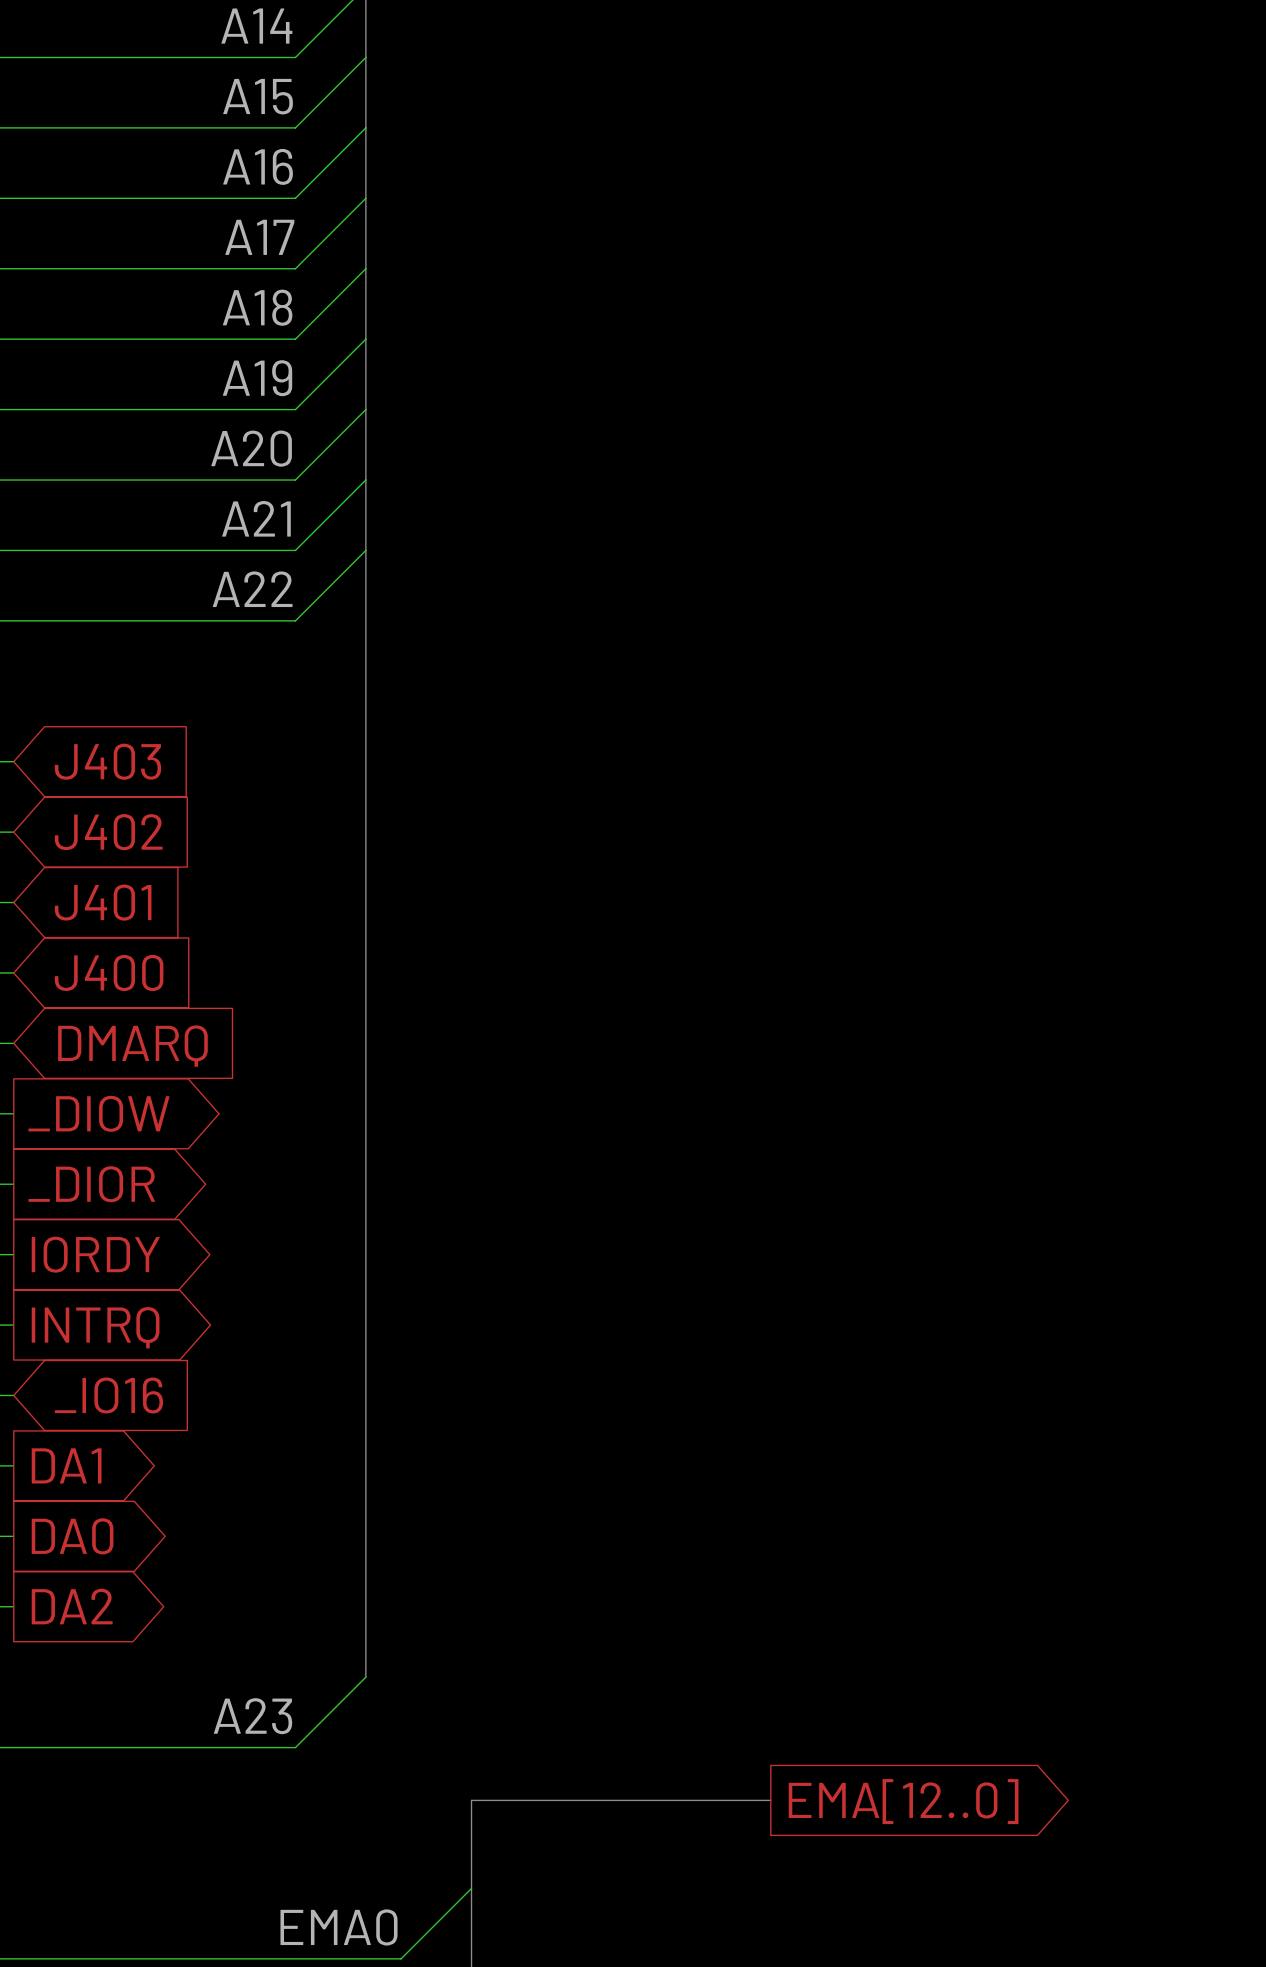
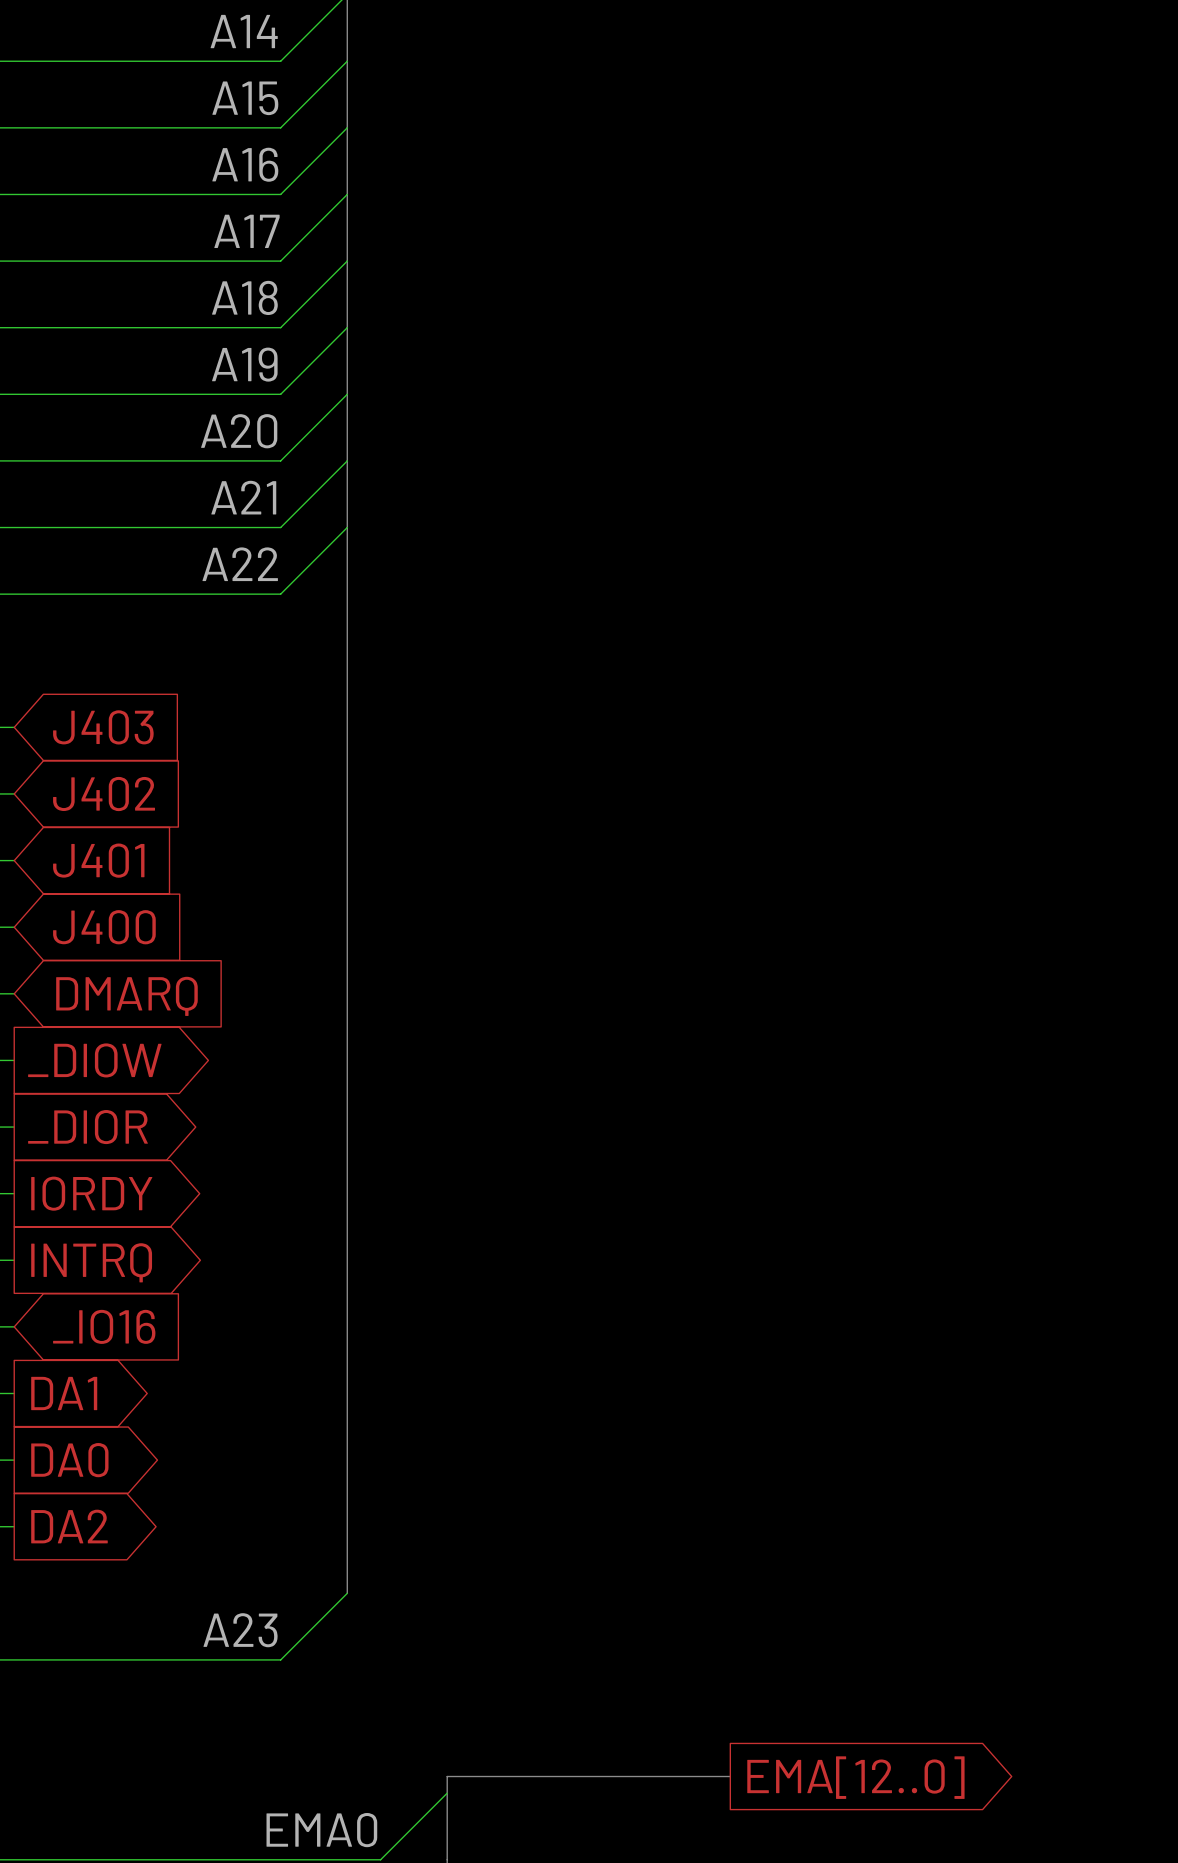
bus: (770, 1800) (471, 1800) (471, 1870) -> (730, 1776) (447, 1776)
global label position: EMA[12..0] (903, 1801) -> EMA[12..0] (855, 1777)

